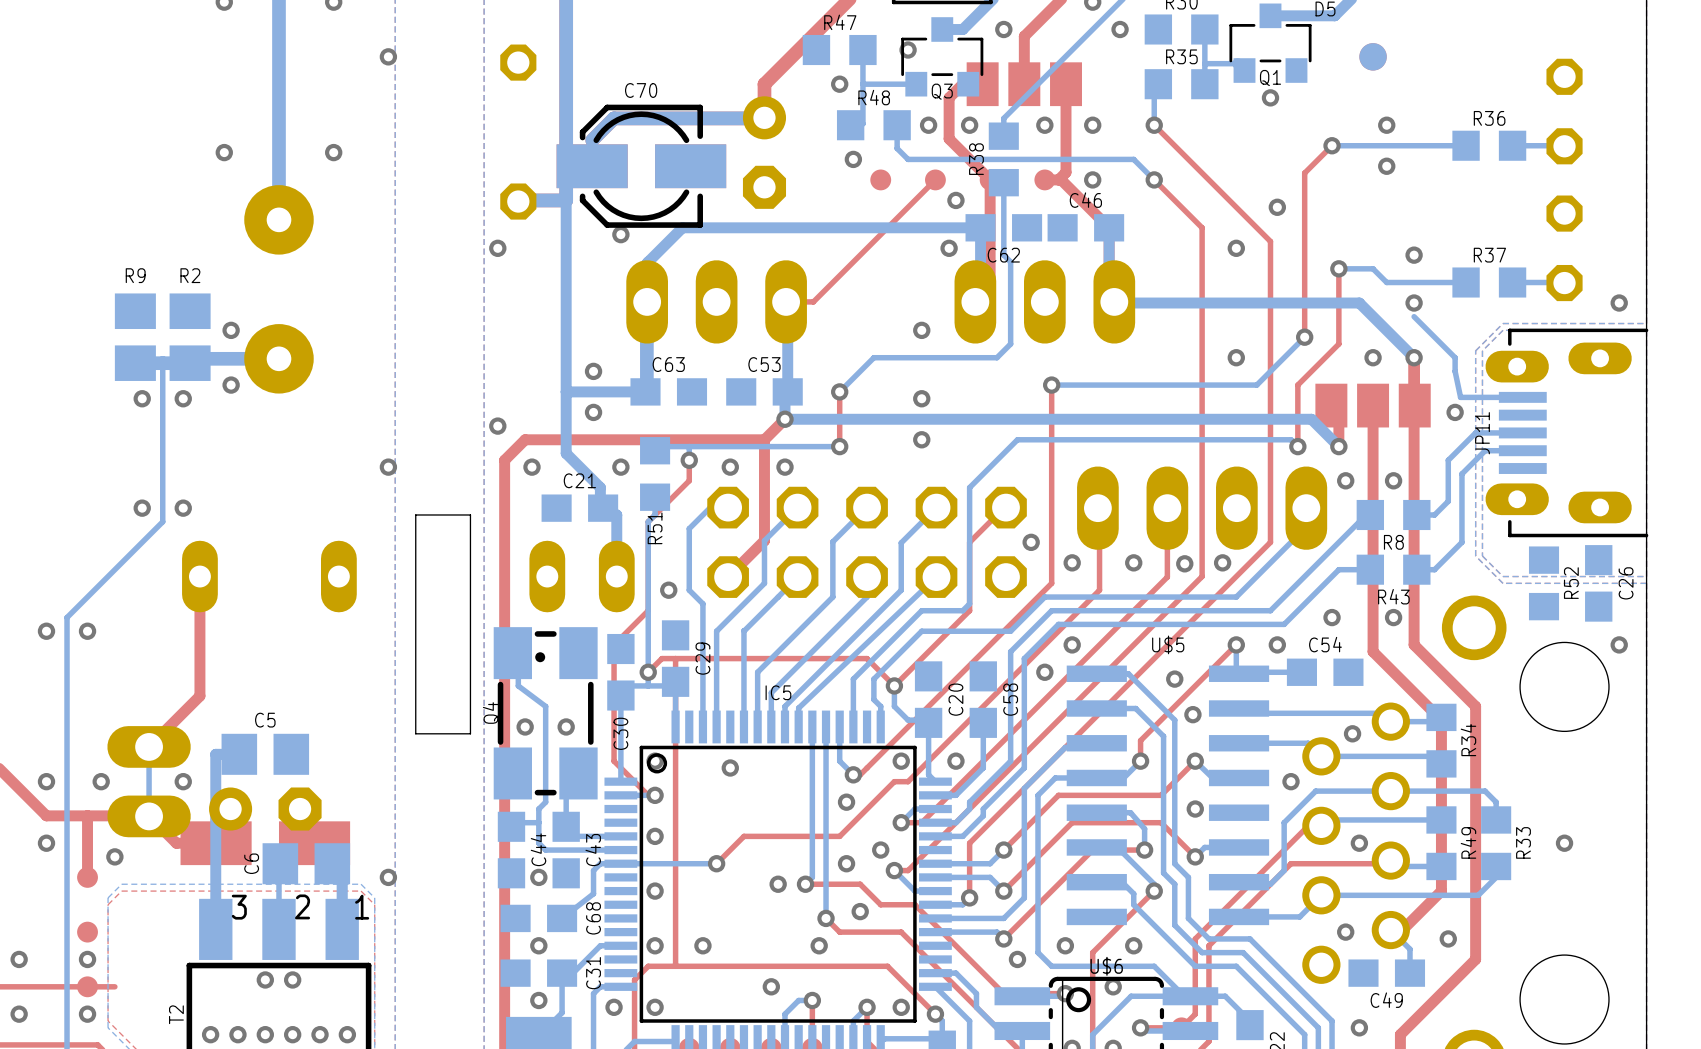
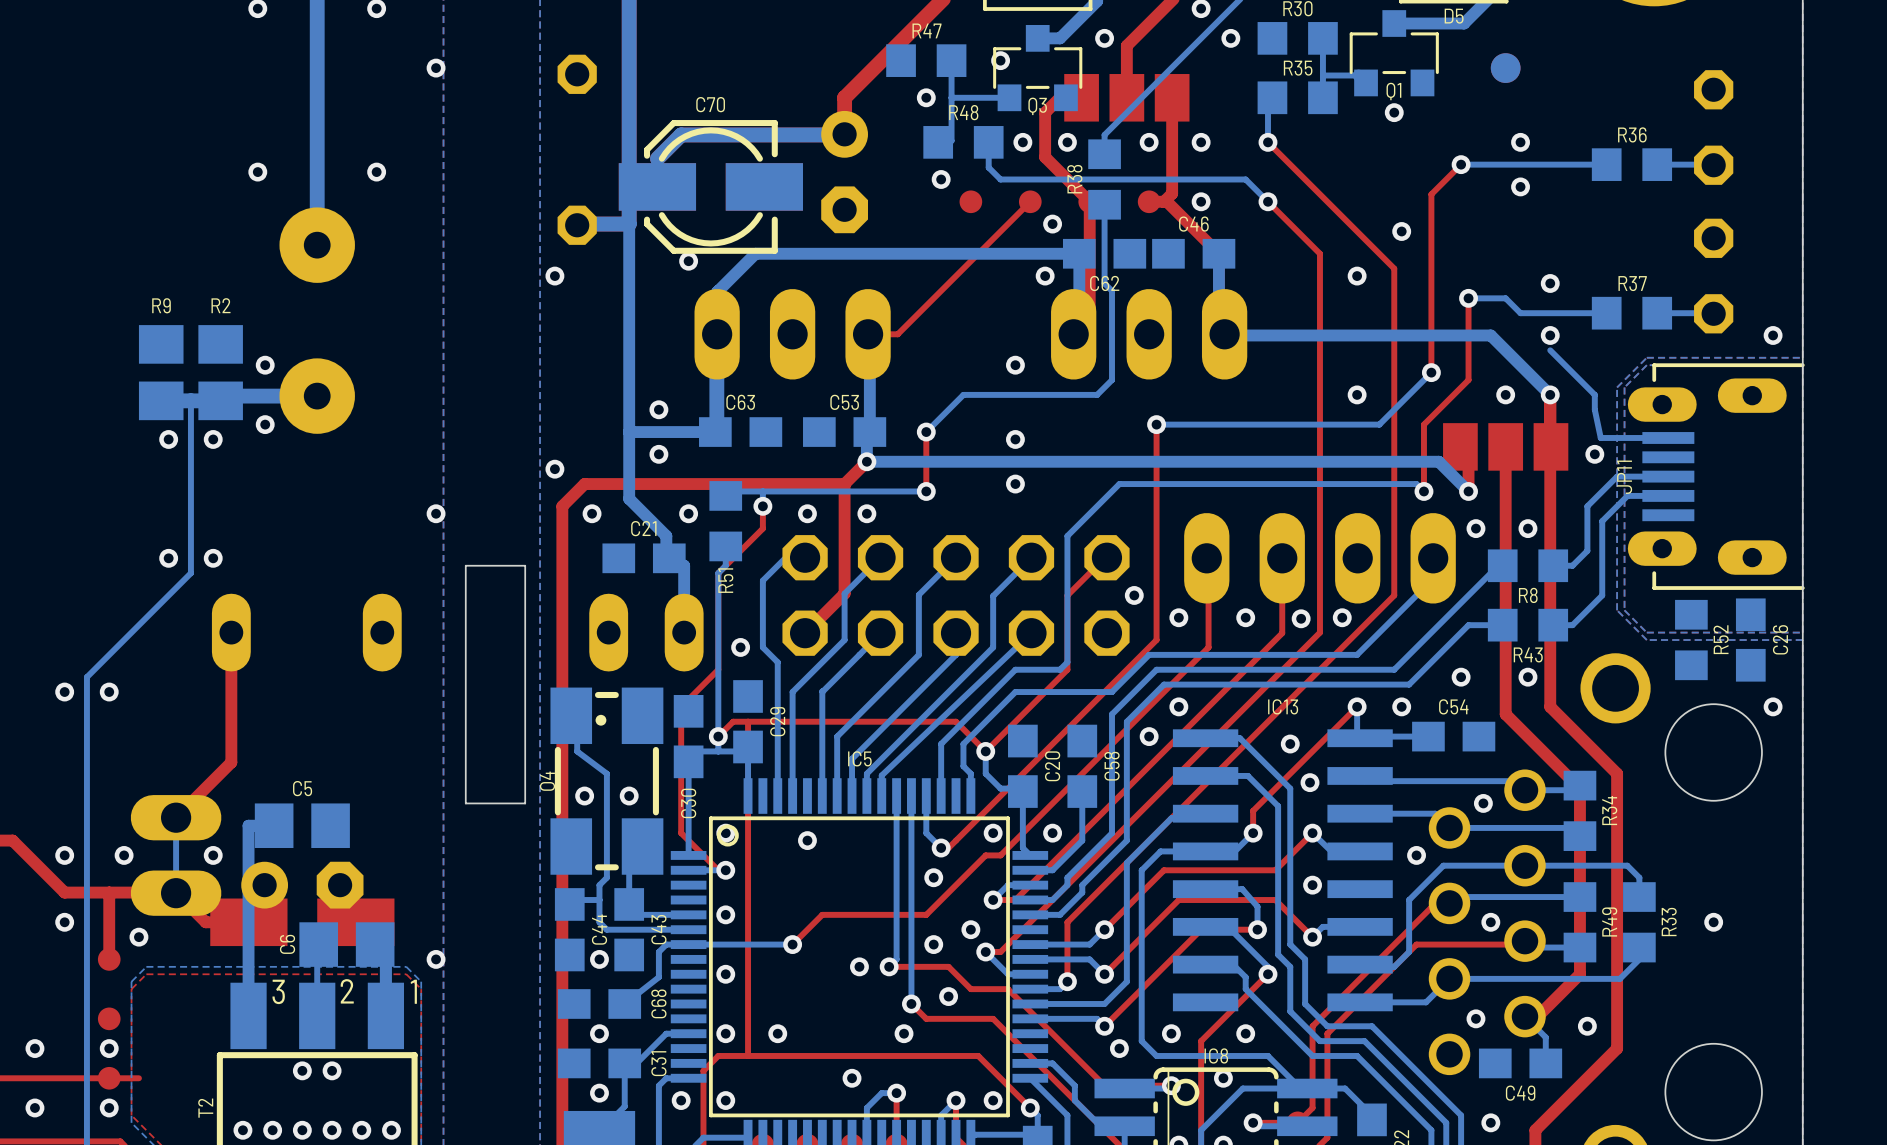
U$5 name: U$5 (1168, 644) -> IC13 (1283, 706)
U$6 name: U$6 (1106, 966) -> IC8 (1216, 1055)

